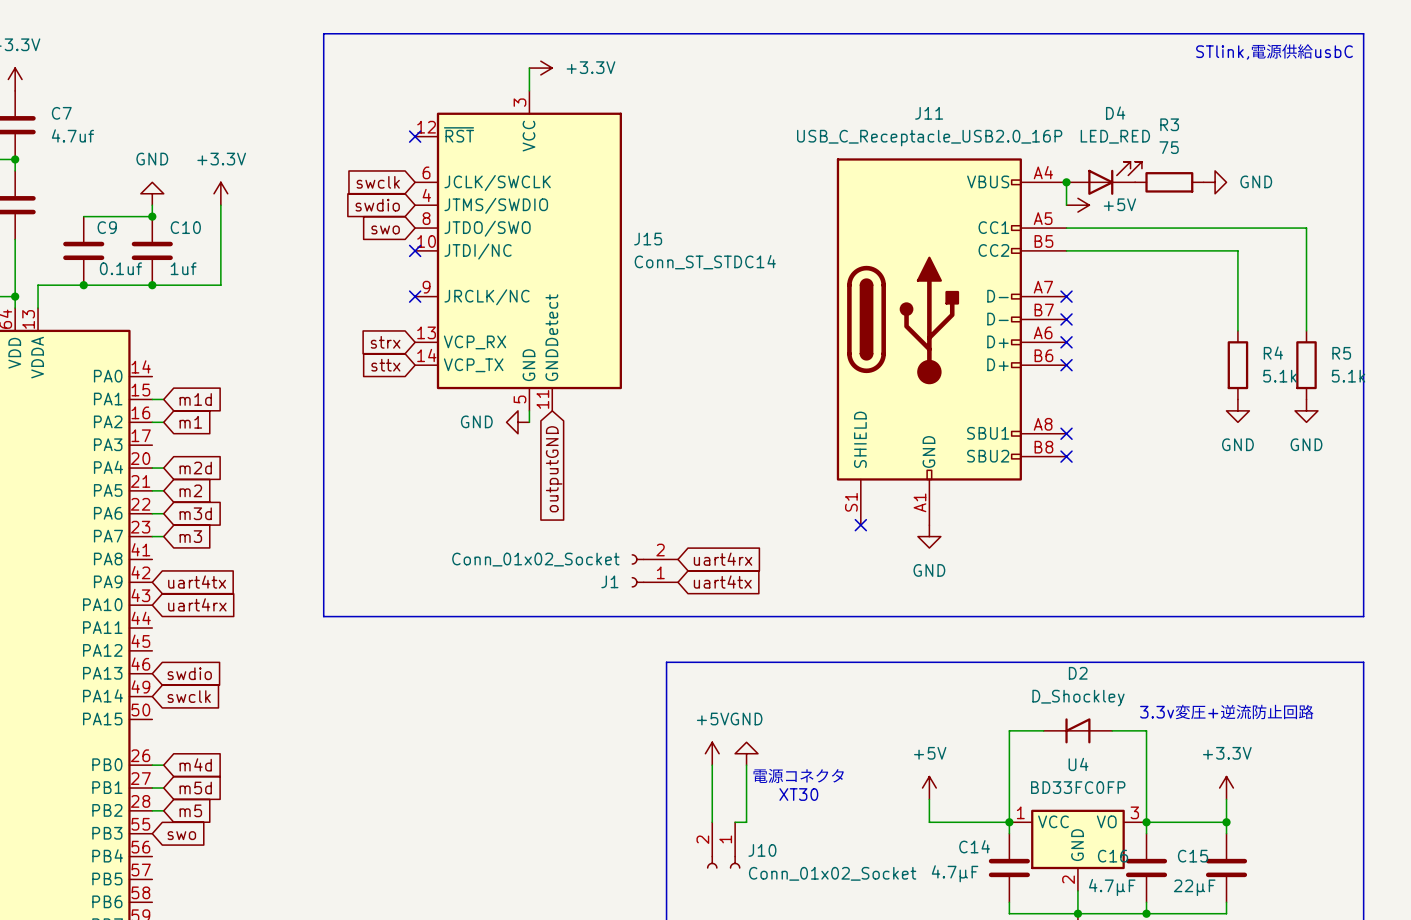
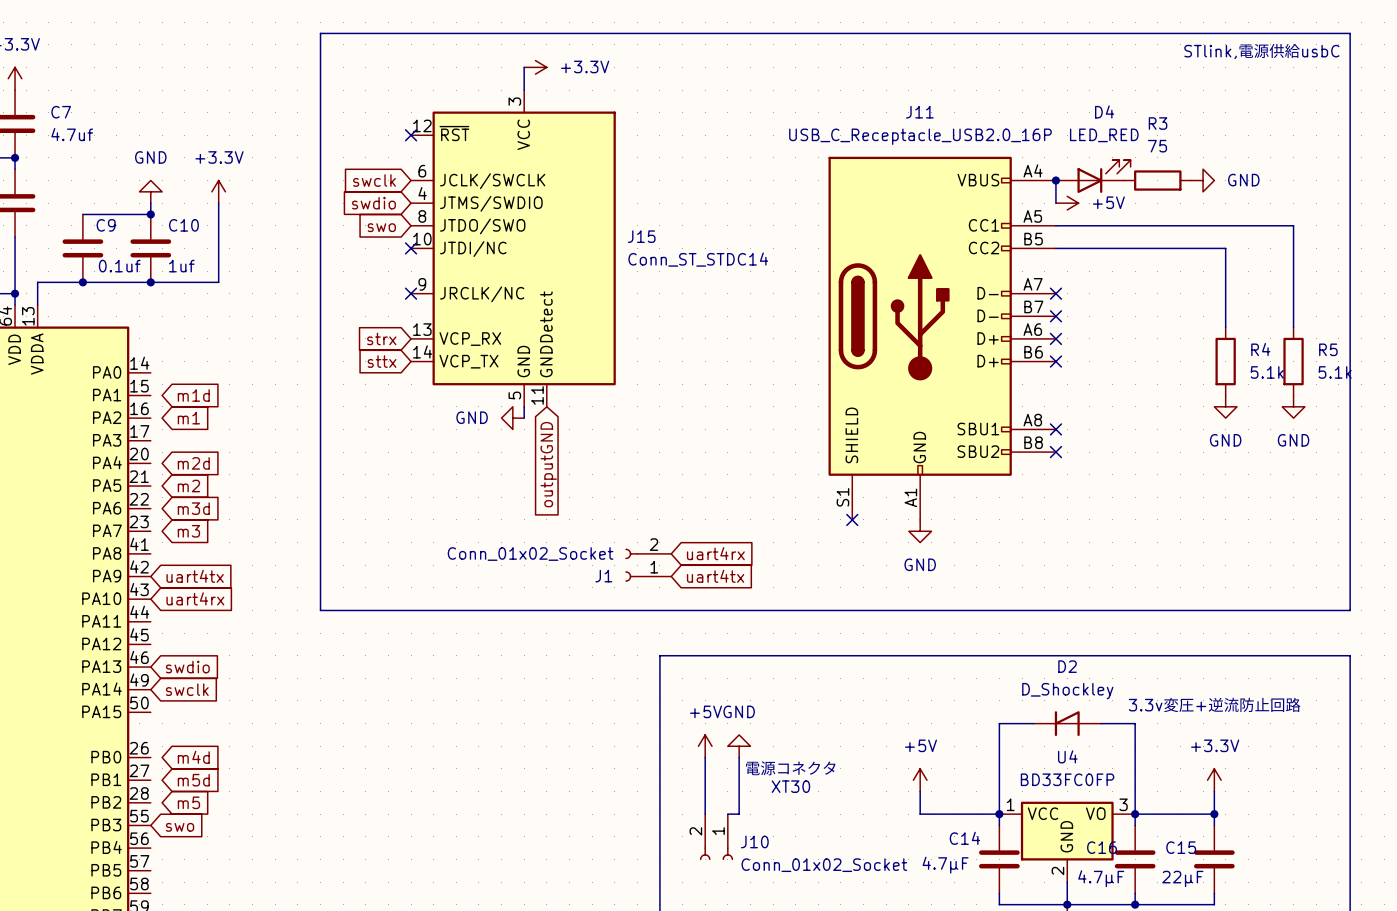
wire: (152, 399) (163, 399) -> none
wire: (152, 422) (163, 422) -> none
wire: (152, 468) (163, 468) -> none
wire: (152, 490) (163, 490) -> none
wire: (152, 513) (163, 513) -> none
wire: (152, 536) (163, 536) -> none
wire: (152, 765) (163, 765) -> none
wire: (152, 788) (163, 788) -> none
wire: (152, 810) (163, 810) -> none

